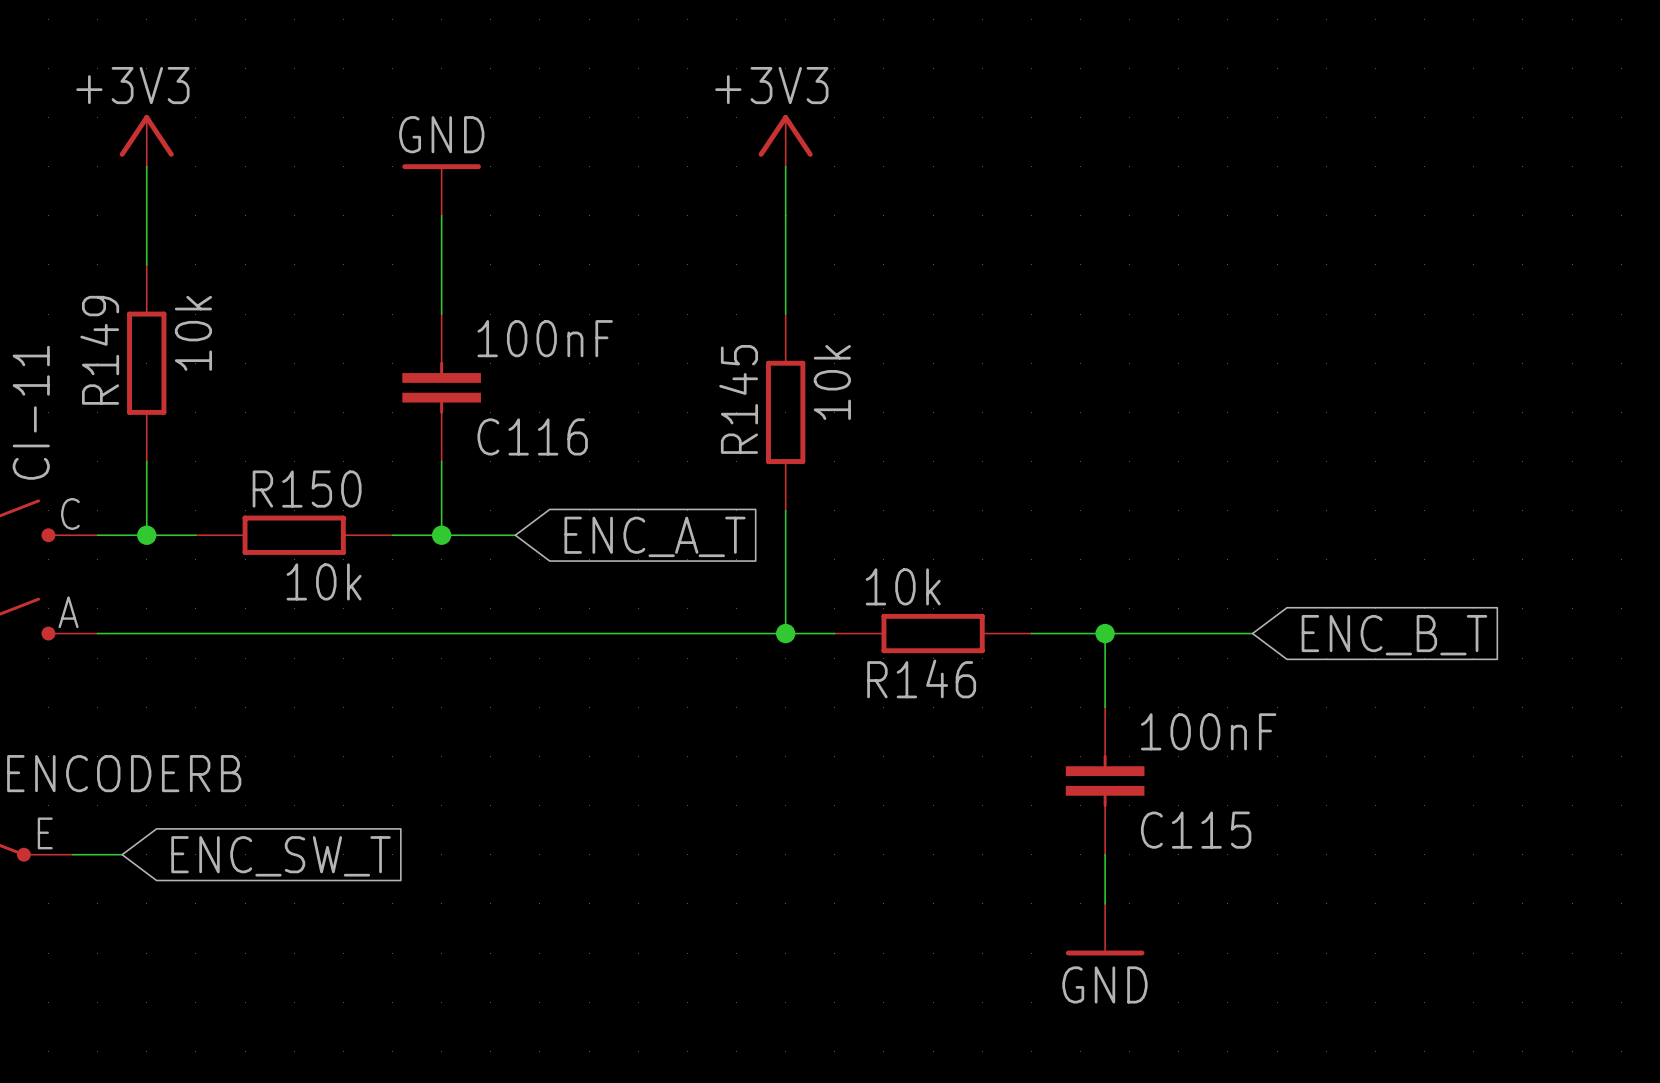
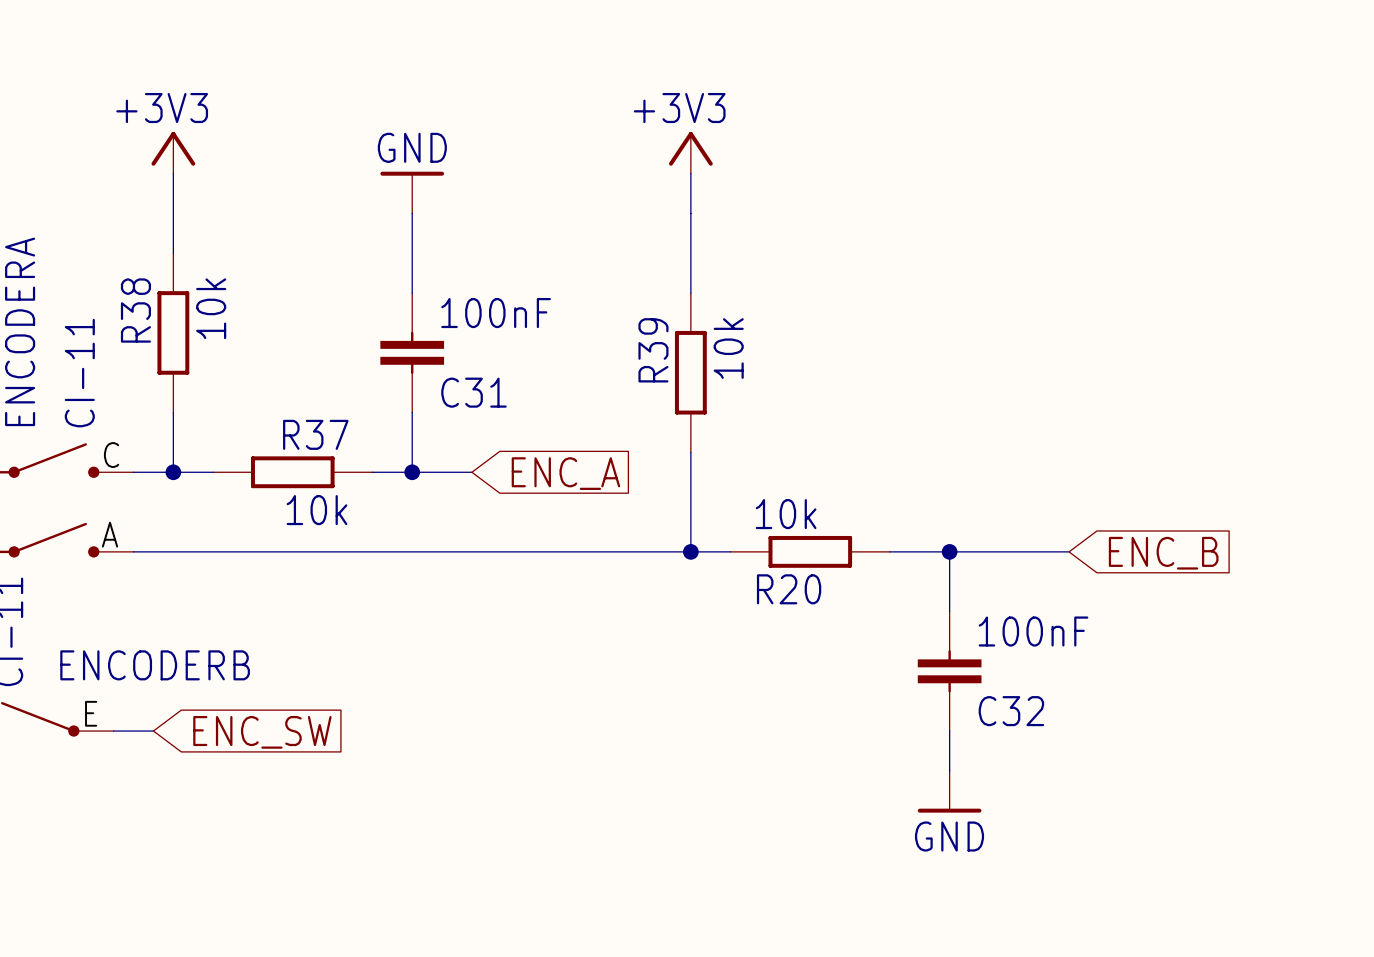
R149 name: R149 (99, 350) -> R38 (135, 310)
R145 name: R145 (738, 399) -> R39 (653, 350)
C116 name: C116 (532, 436) -> C31 (473, 392)
R150 name: R150 (307, 489) -> R37 (315, 434)
global label: ENC_A_T (655, 536) -> ENC_A (565, 473)
global label: ENC_B_T (1394, 635) -> ENC_B (1163, 553)
R146 name: R146 (921, 678) -> R20 (789, 589)
C115 name: C115 (1196, 830) -> C32 (1011, 711)
global label: ENC_SW_T (281, 856) -> ENC_SW (262, 732)

